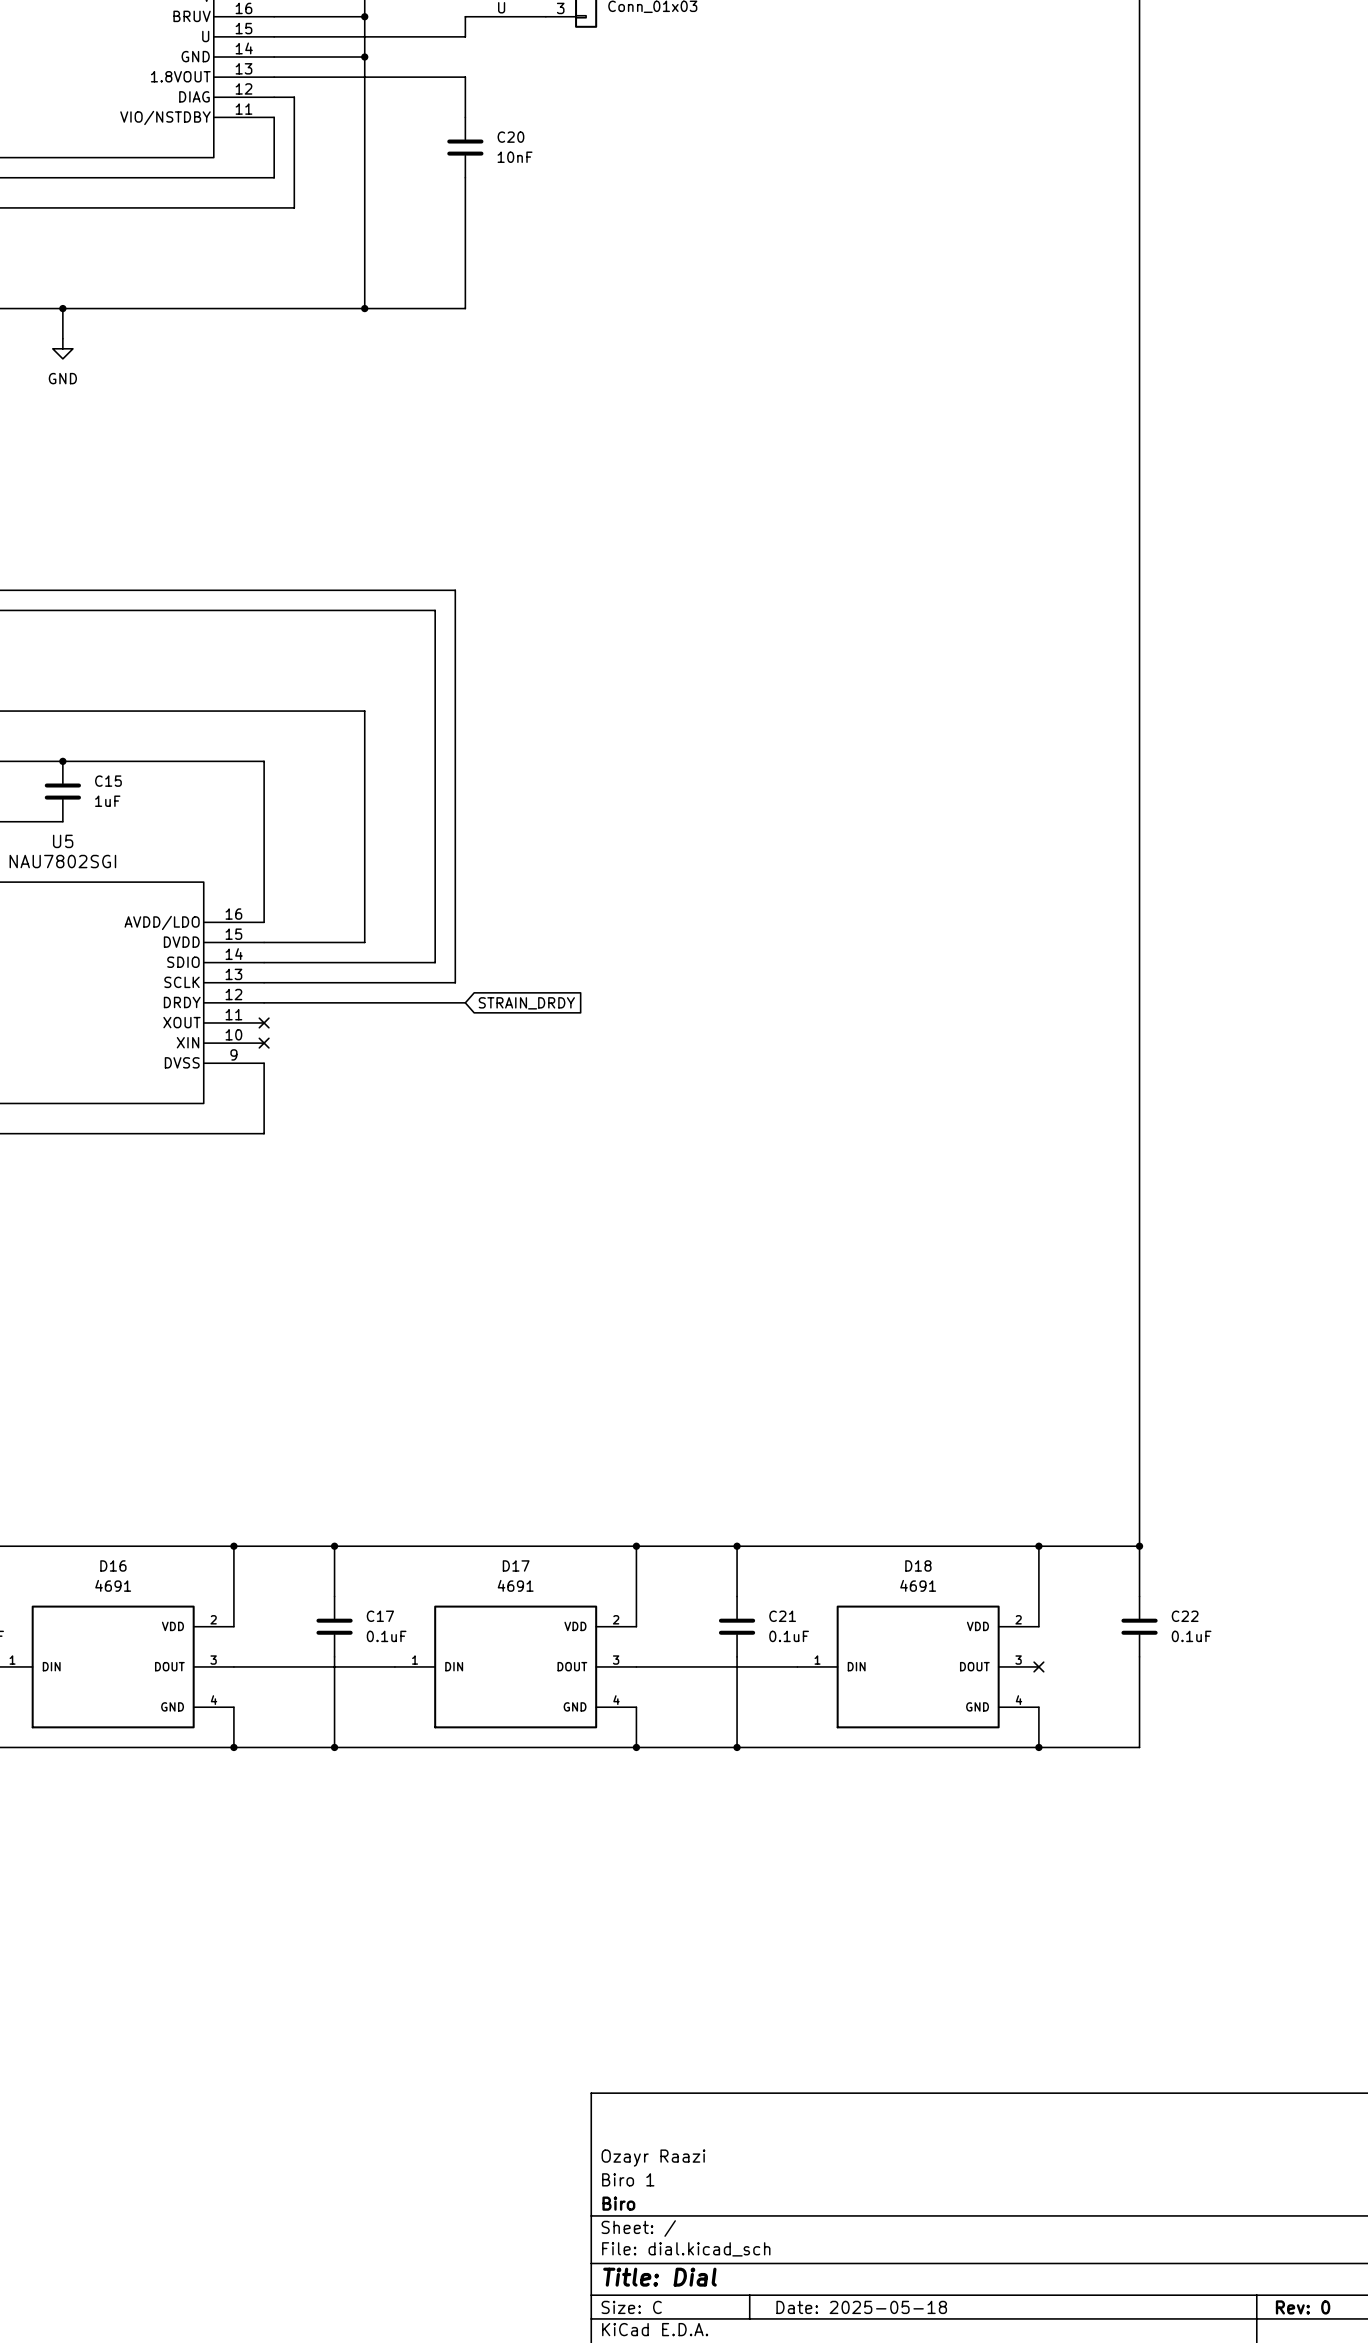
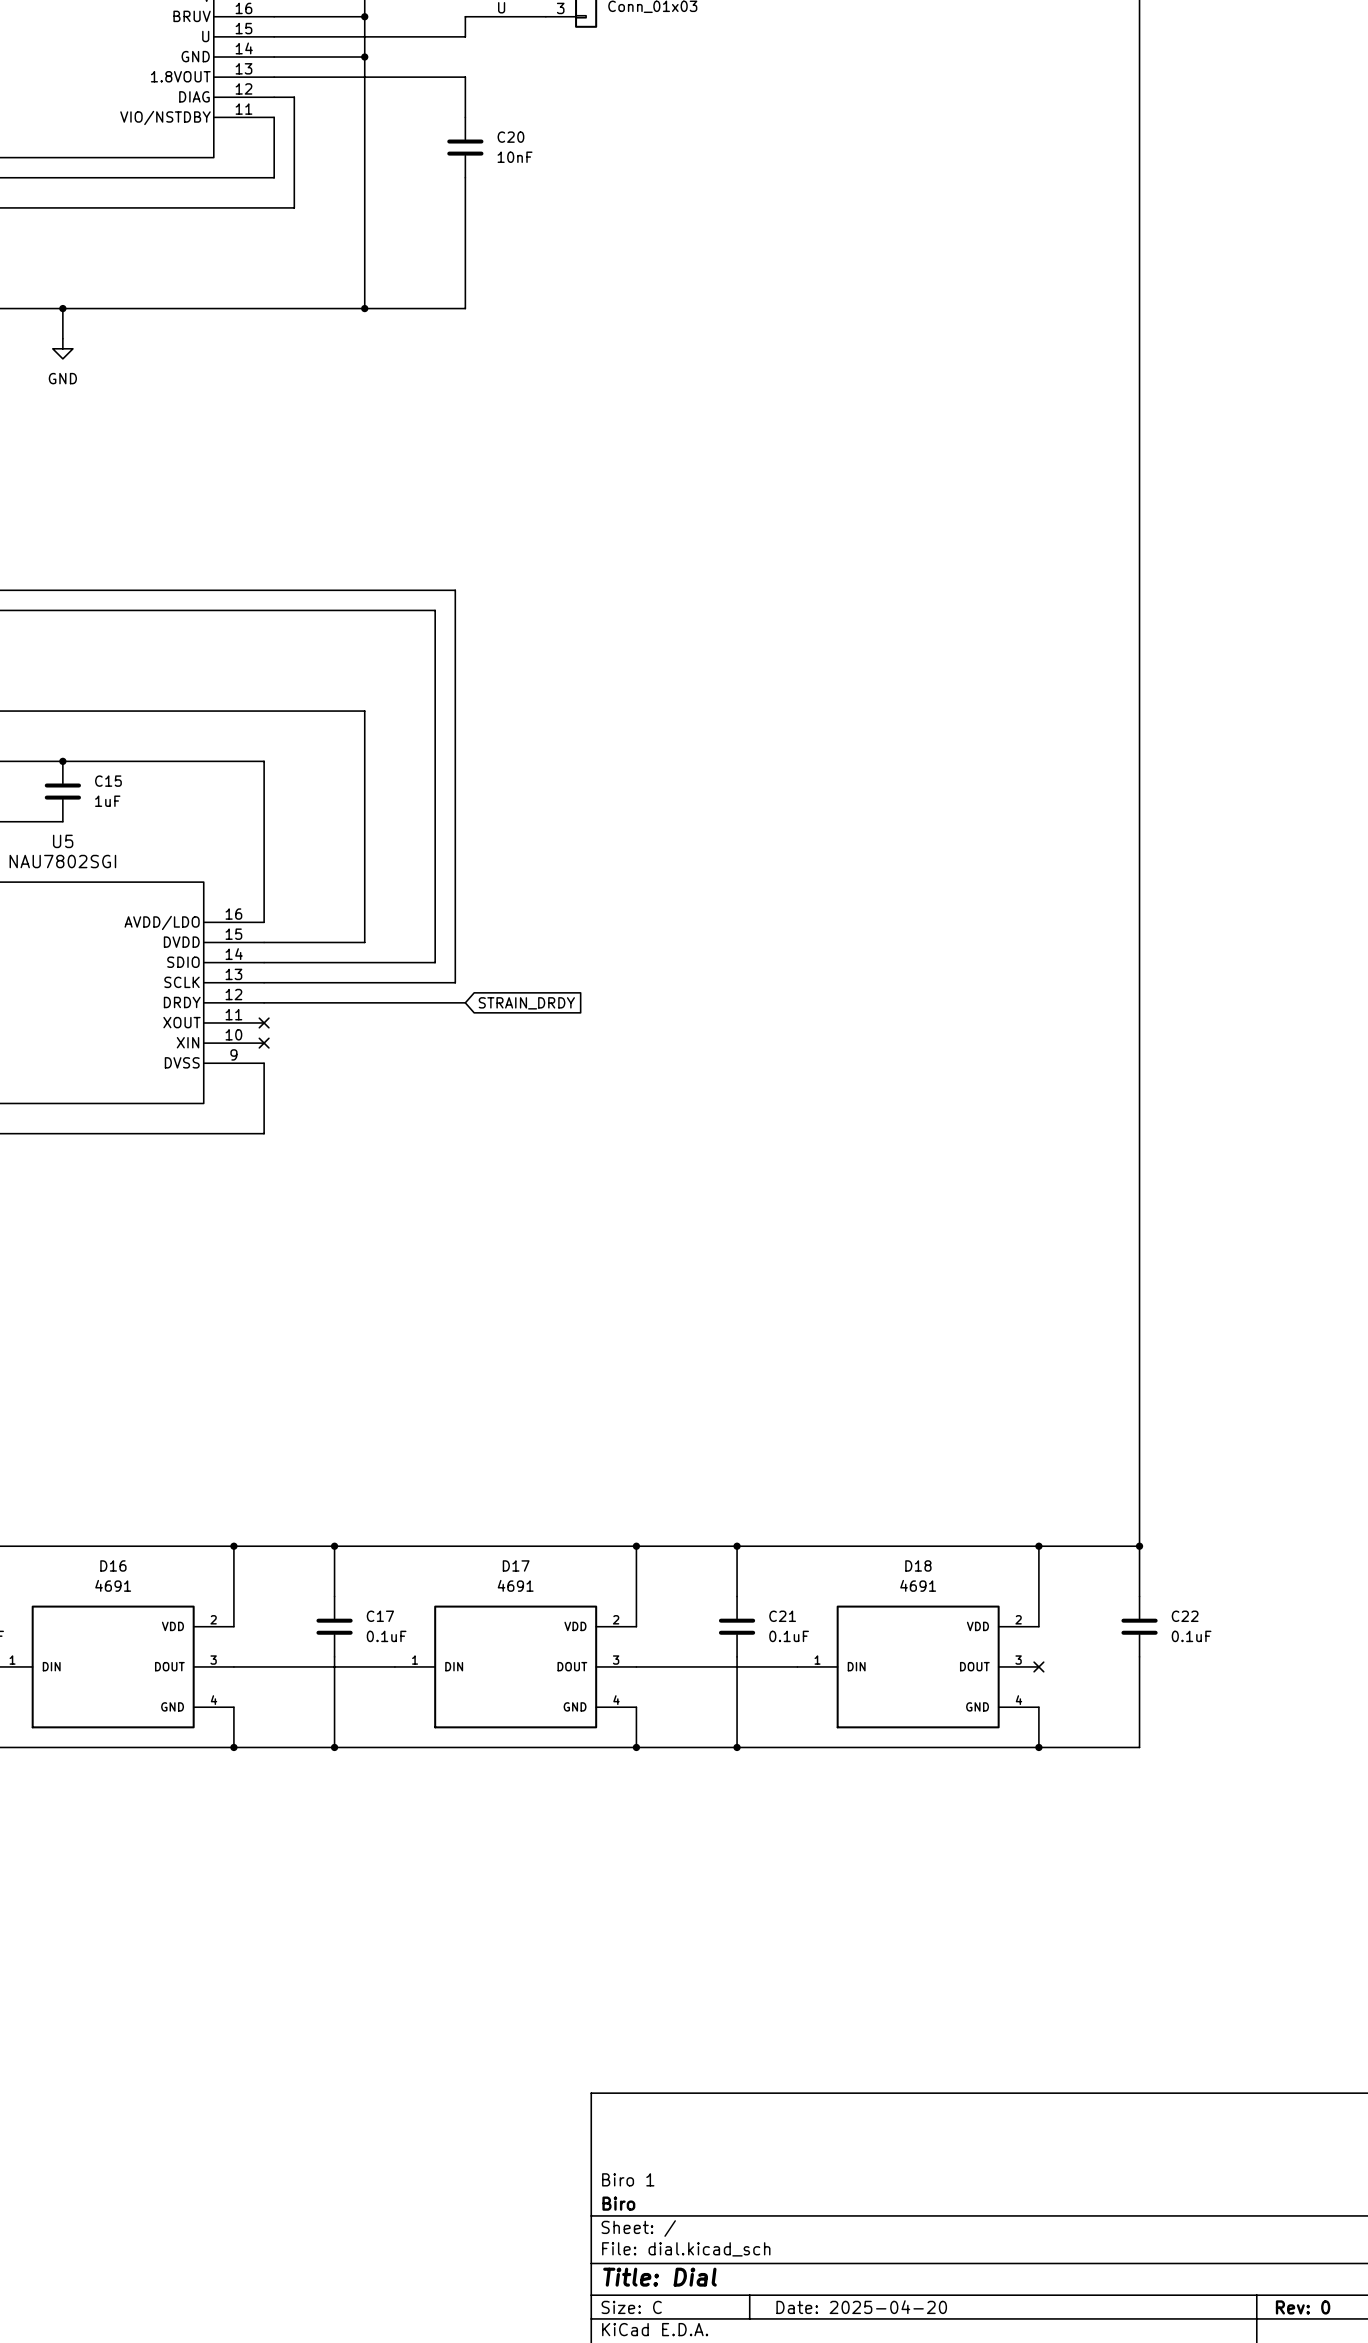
title block: Ozayr Raazi (653, 2158) -> none
title block: Date: 2025-05-18 (861, 2307) -> Date: 2025-04-20 (861, 2307)

